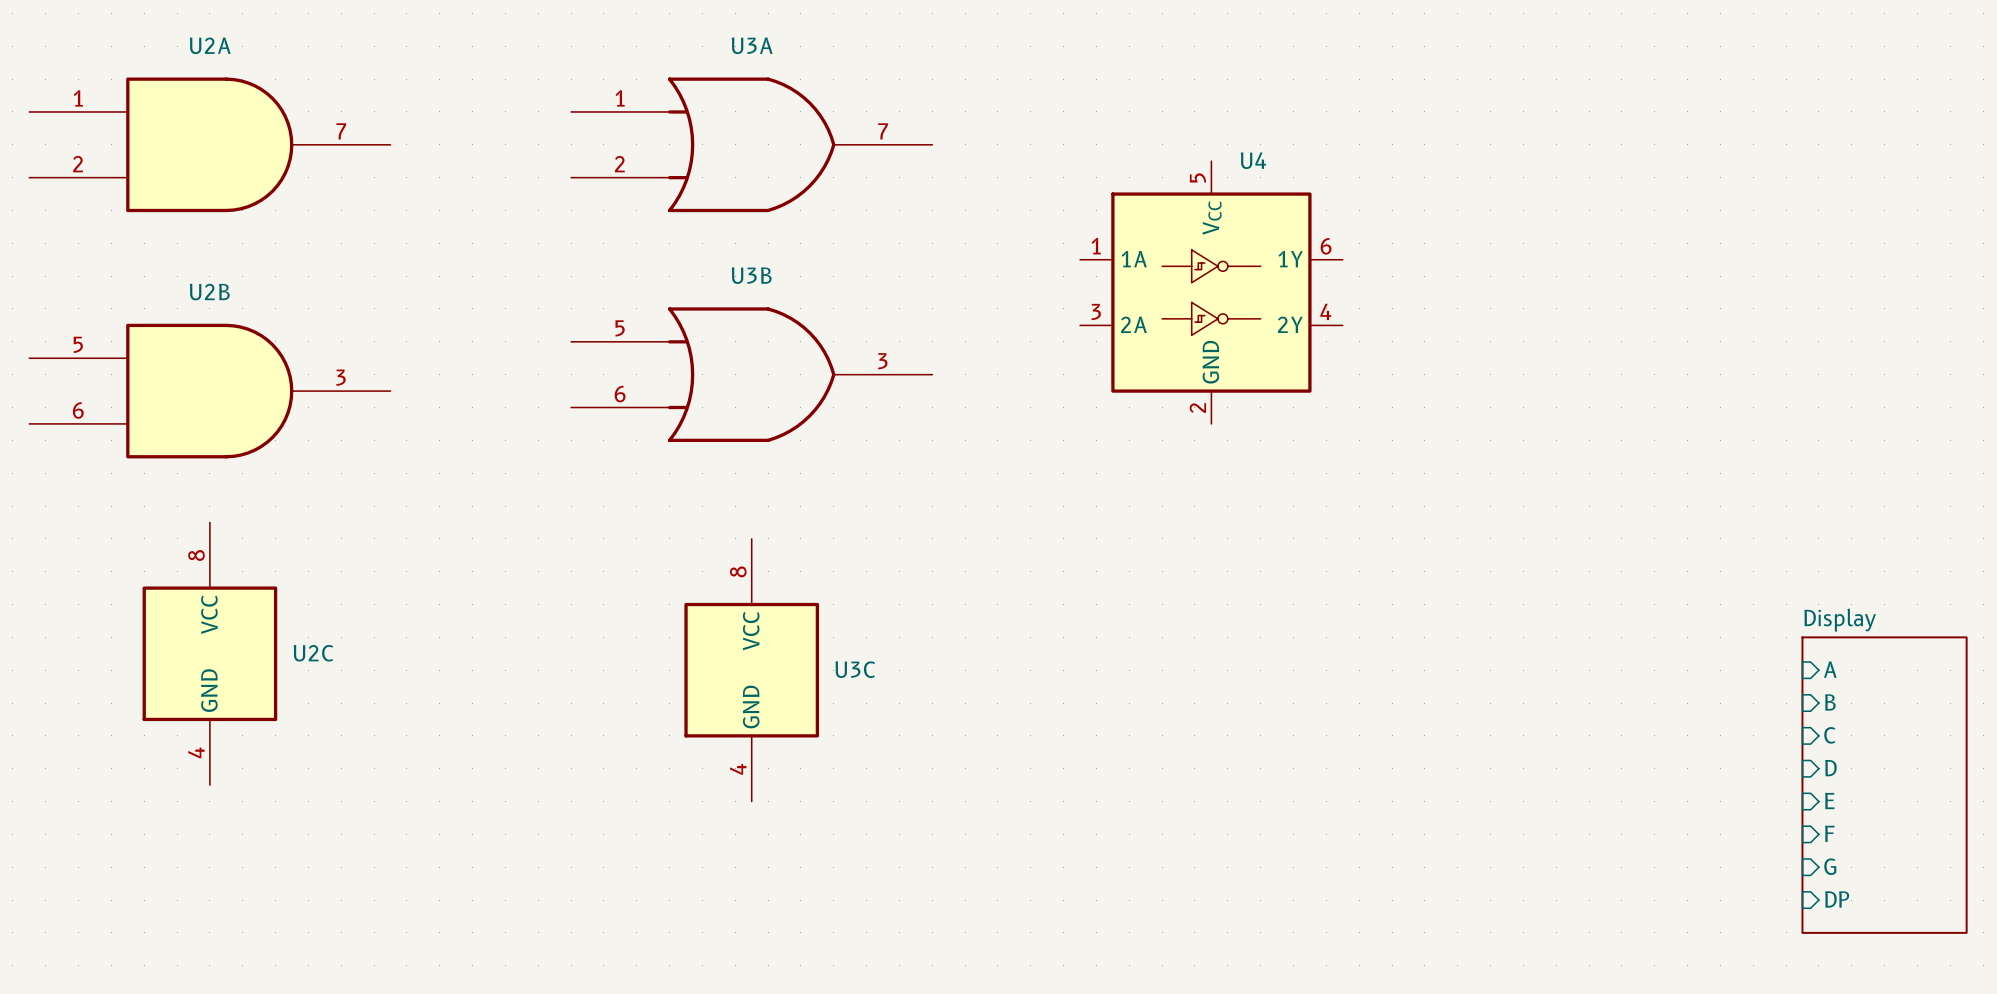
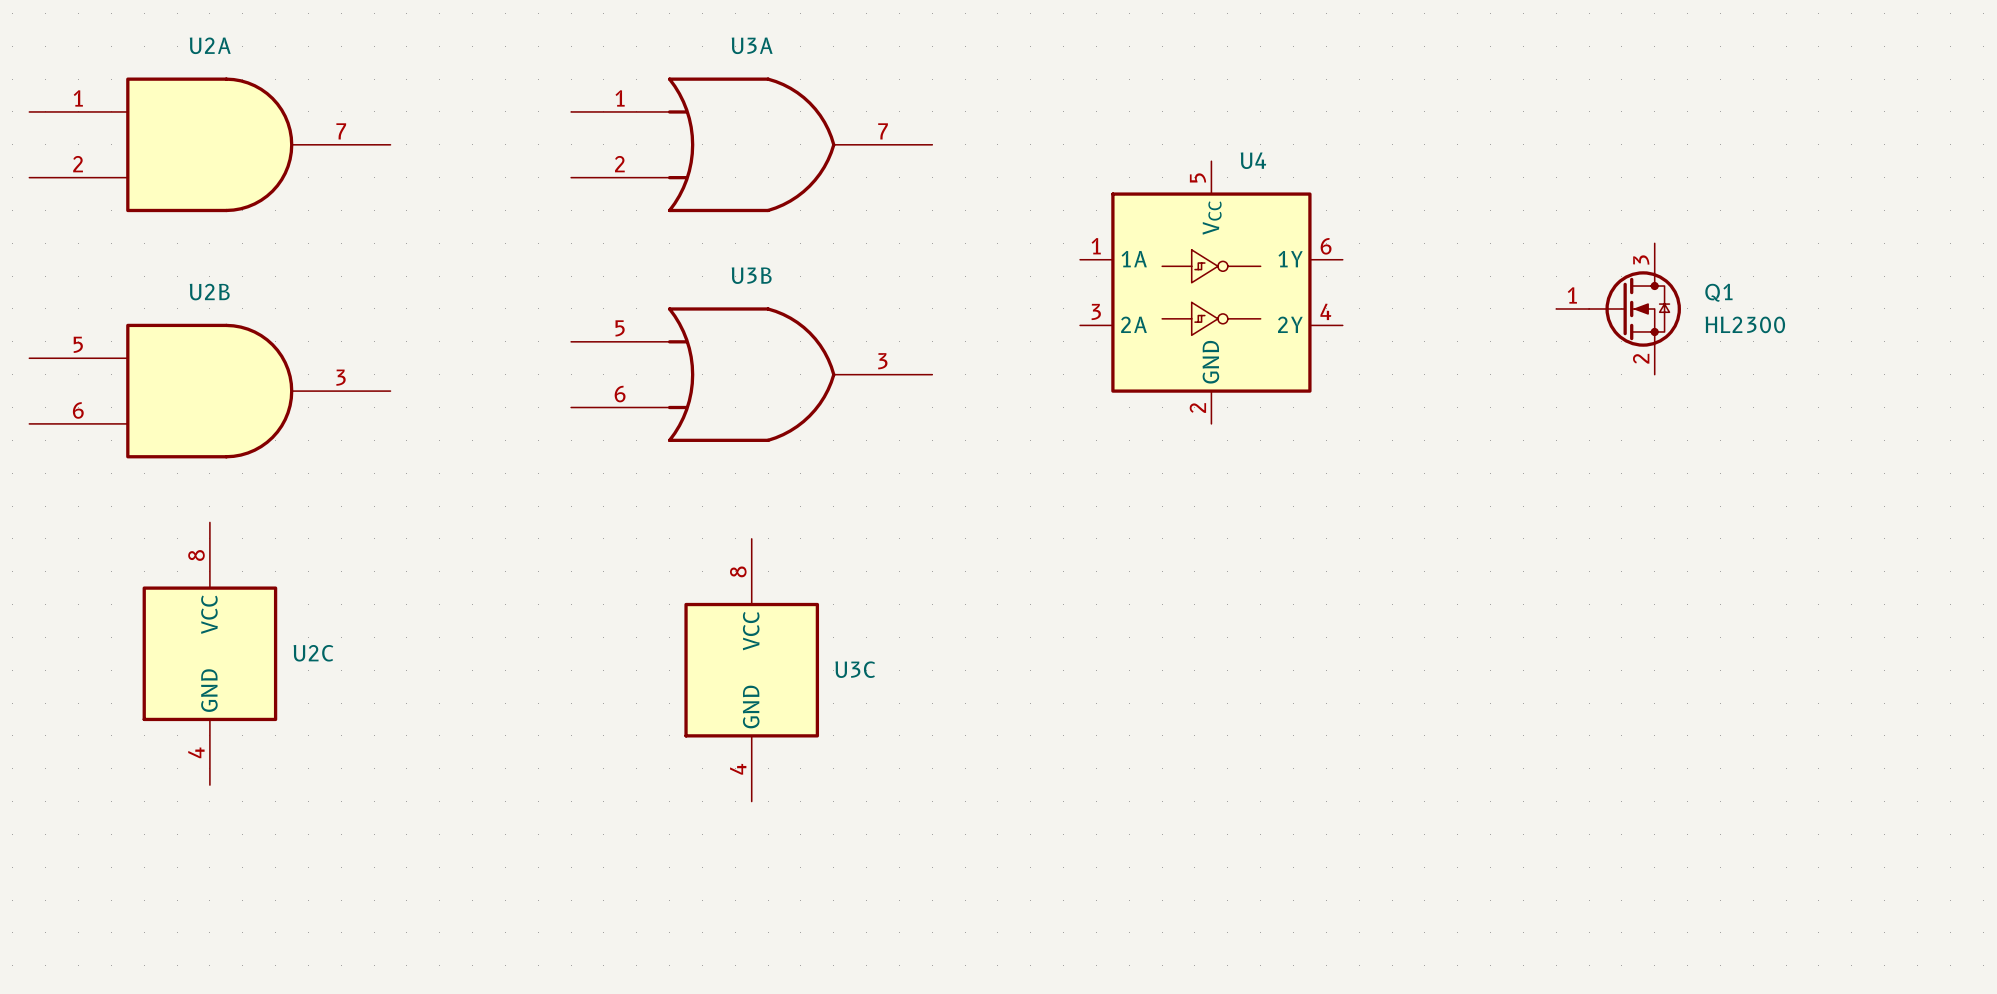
Q1: none -> HL2300 (1618, 308)
sheet pin: A (1830, 669) -> none
sheet pin: B (1830, 702) -> none
sheet pin: C (1829, 735) -> none
sheet pin: D (1830, 768) -> none
sheet Display: (1884, 785) -> none
sheet pin: E (1829, 801) -> none
sheet pin: F (1829, 833) -> none
sheet pin: G (1830, 866) -> none
sheet pin: DP (1837, 899) -> none

